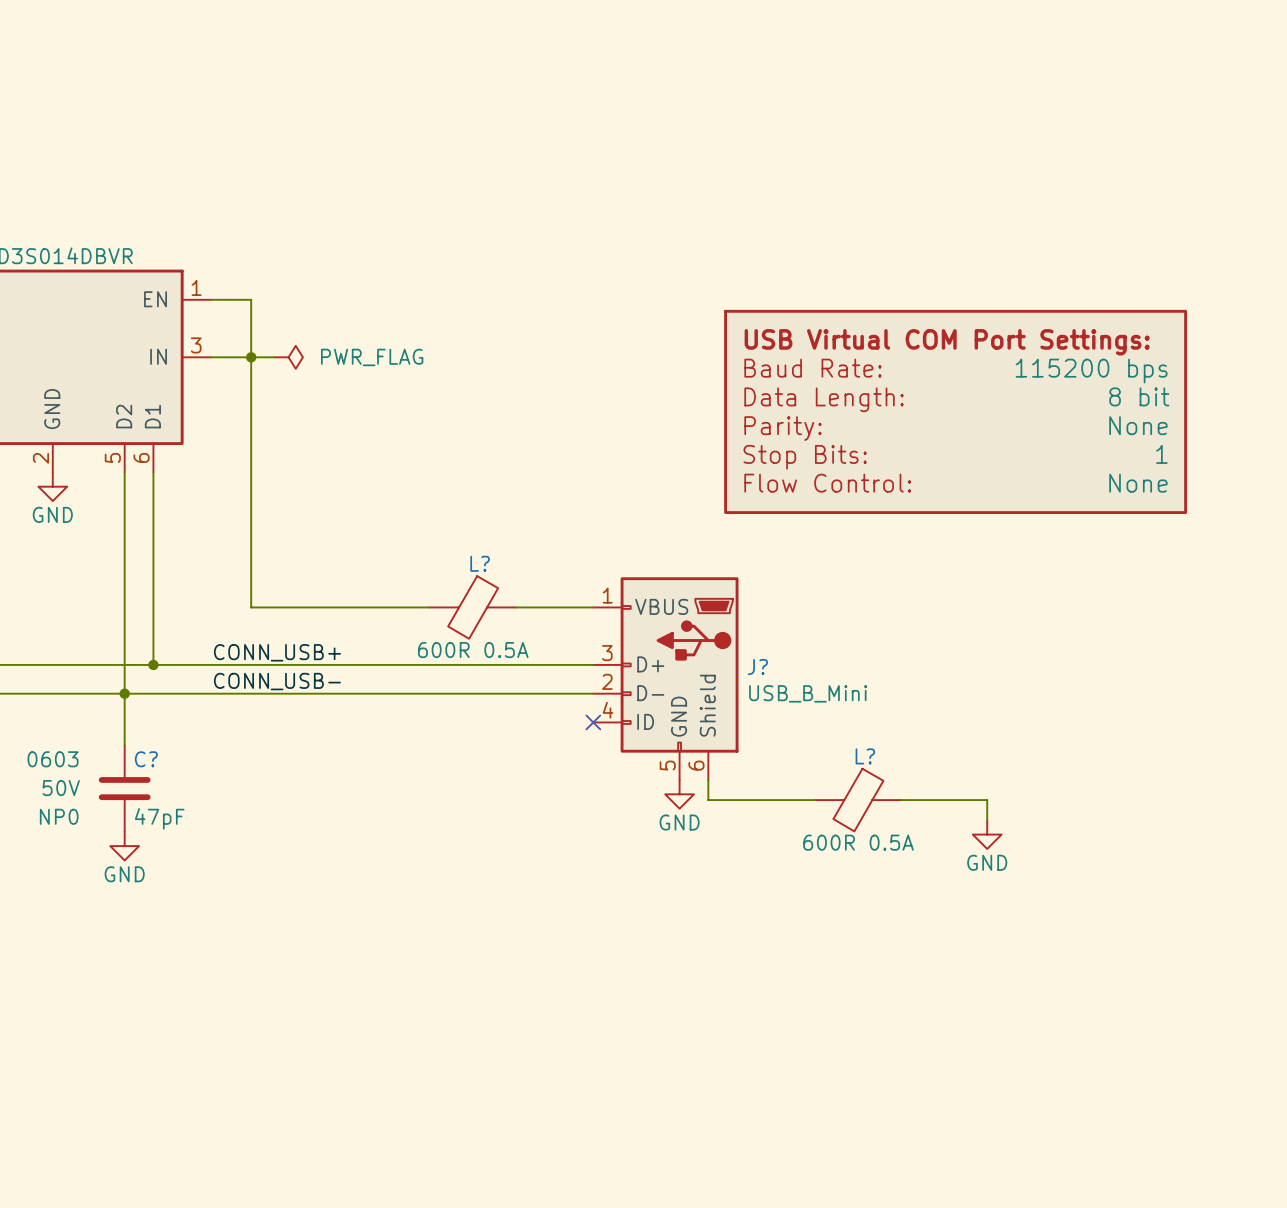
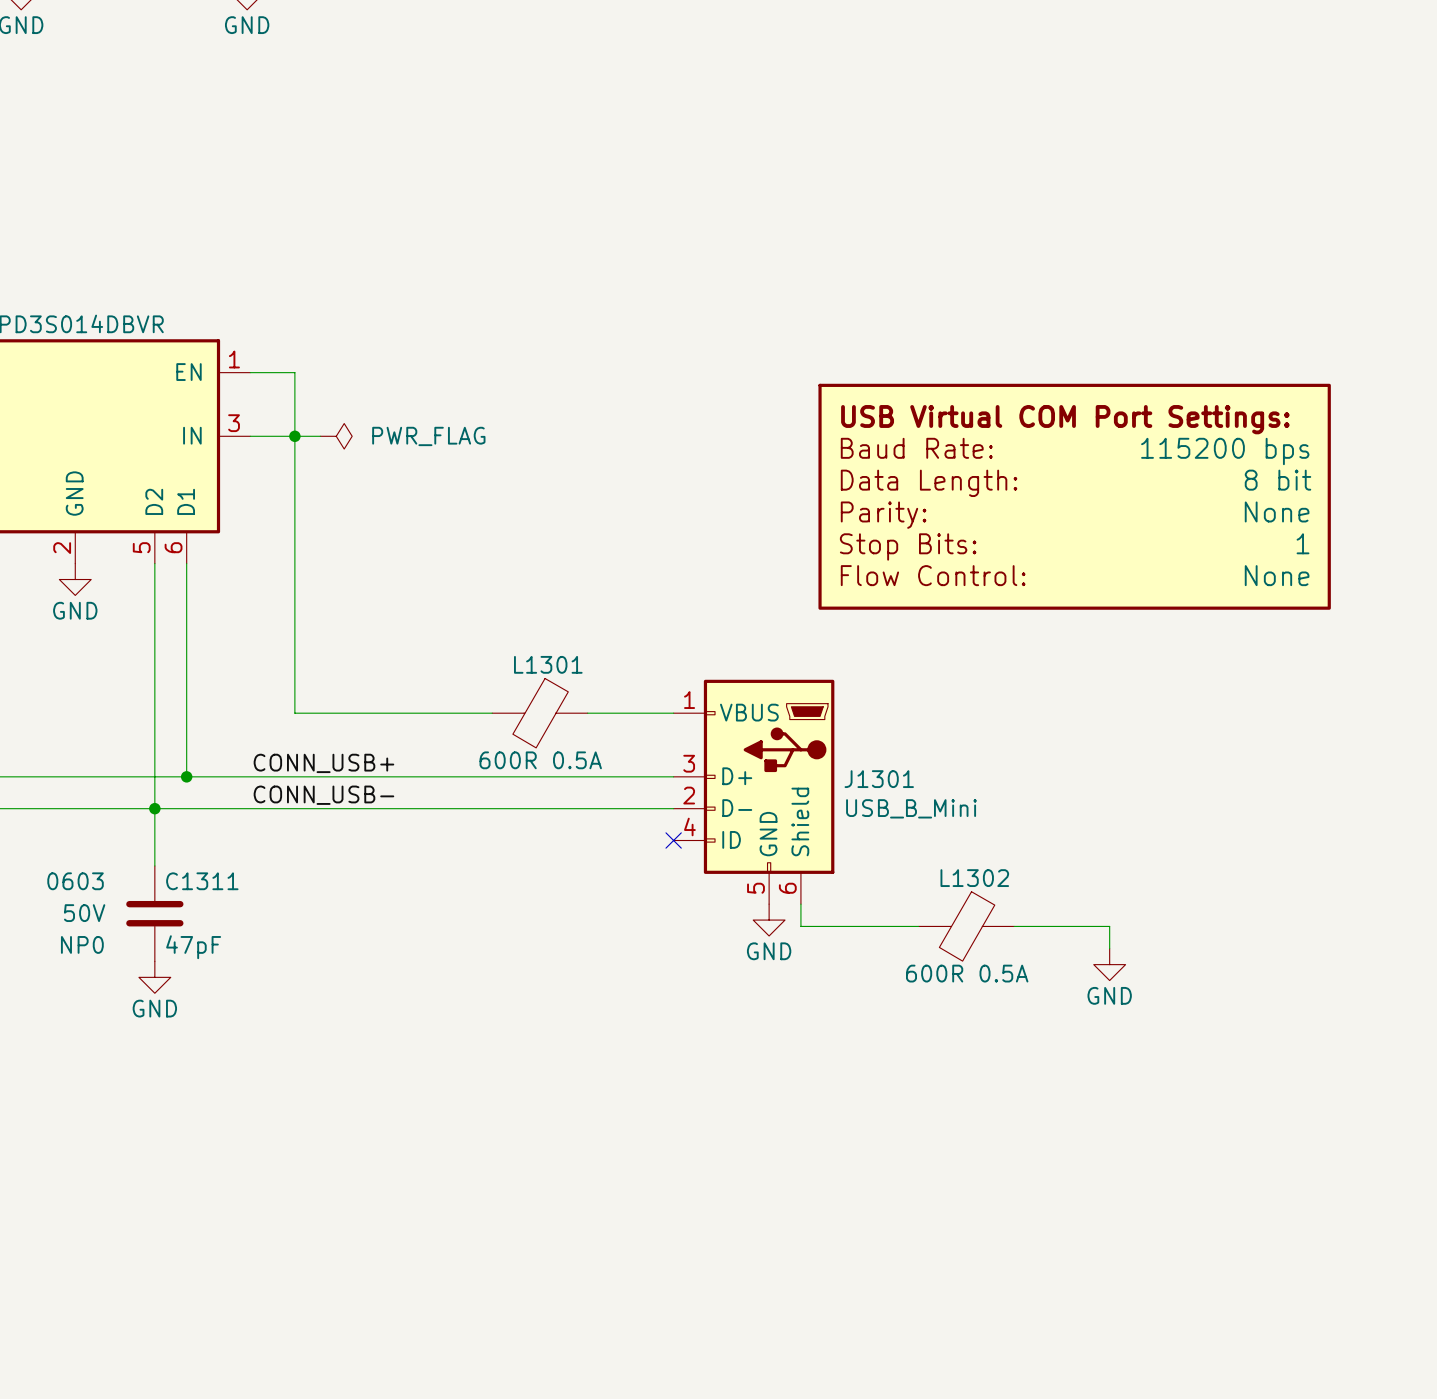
L? name: L? (480, 563) -> L1301 (548, 664)
J? name: J? (757, 667) -> J1301 (879, 779)
L? name: L? (865, 756) -> L1302 (974, 878)
C? name: C? (146, 759) -> C1311 (202, 881)

